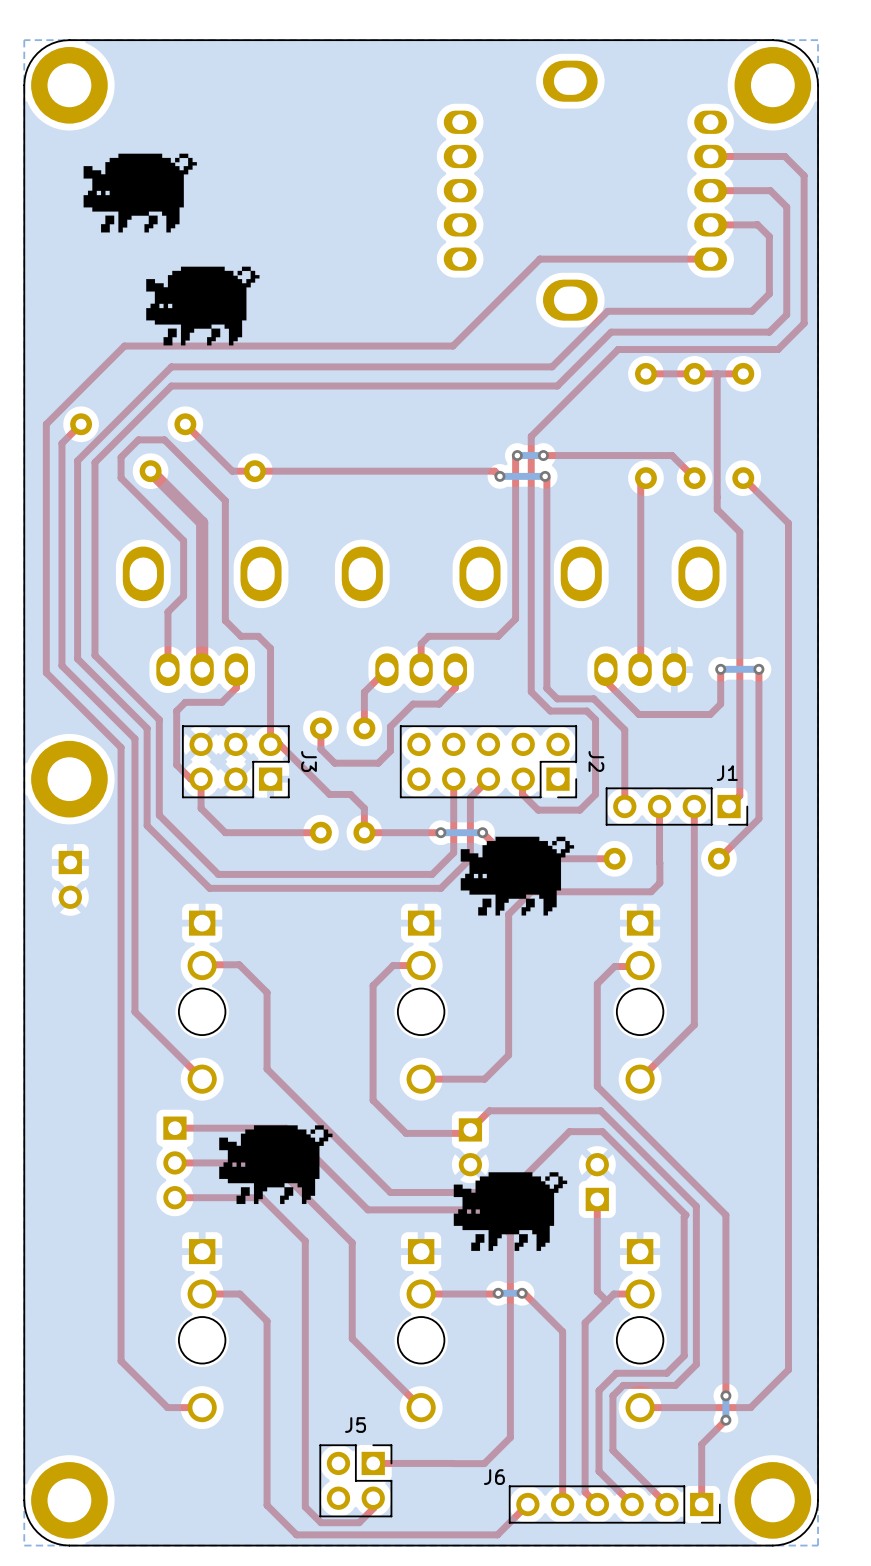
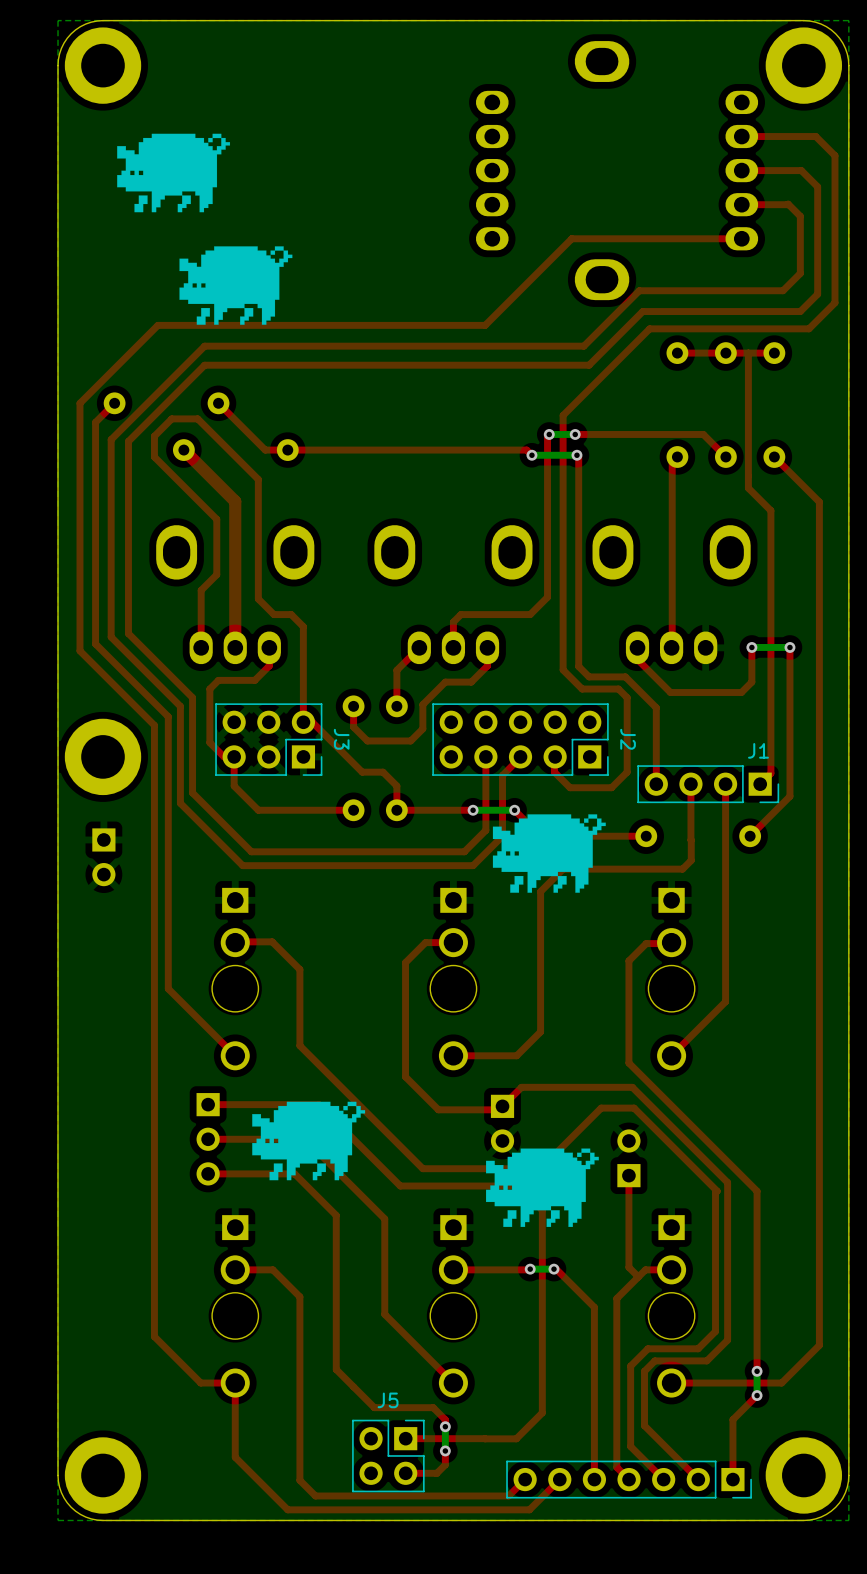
top track: (303, 1239) (305, 1241) (305, 1507) (320, 1522) (359, 1522) (373, 1508) (373, 1498) -> (336, 1215) (336, 1369) (374, 1407) (433, 1407) (445, 1419) (445, 1426)
bottom track: none -> (445, 1426) (445, 1450)
via: none -> (445, 1426)
top track: none -> (445, 1450) (445, 1464) (436, 1473)
via: none -> (445, 1450)
top track: none -> (436, 1473) (405, 1473)
top track: none -> (525, 1479) (508, 1495) (315, 1495)
part: none -> (629, 1479)
J6: (614, 1504) -> none
top track: (282, 1520) (296, 1534) -> (235, 1383) (235, 1457) (287, 1509) (329, 1509)

